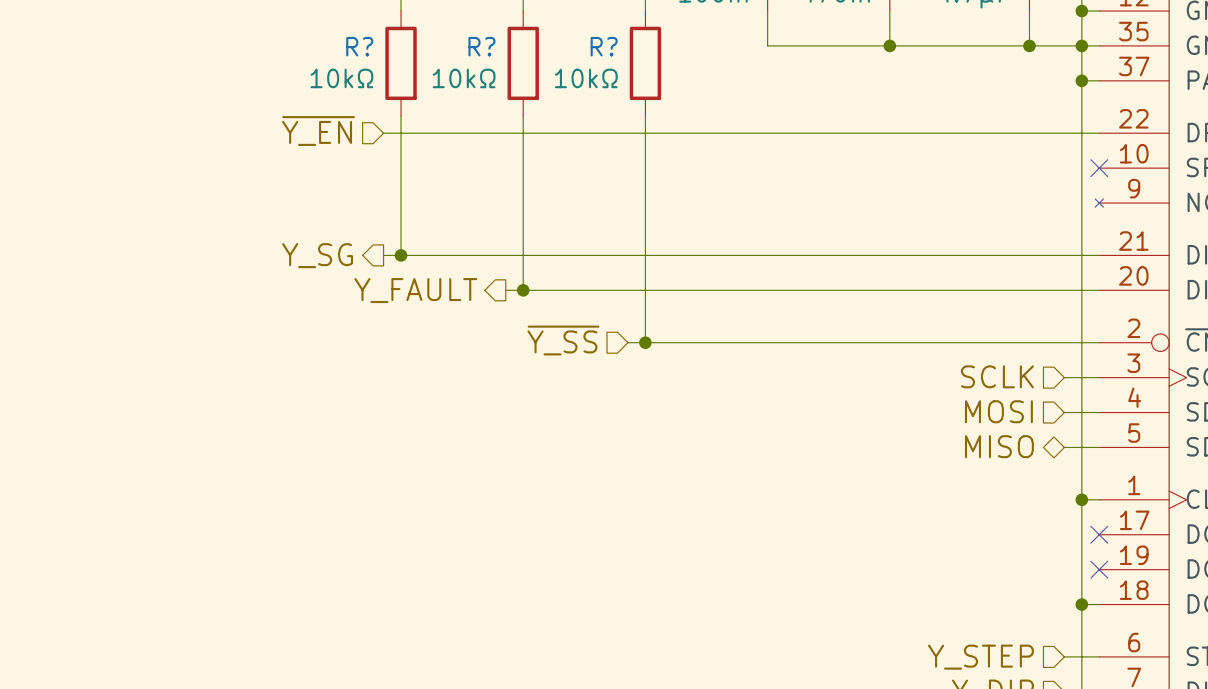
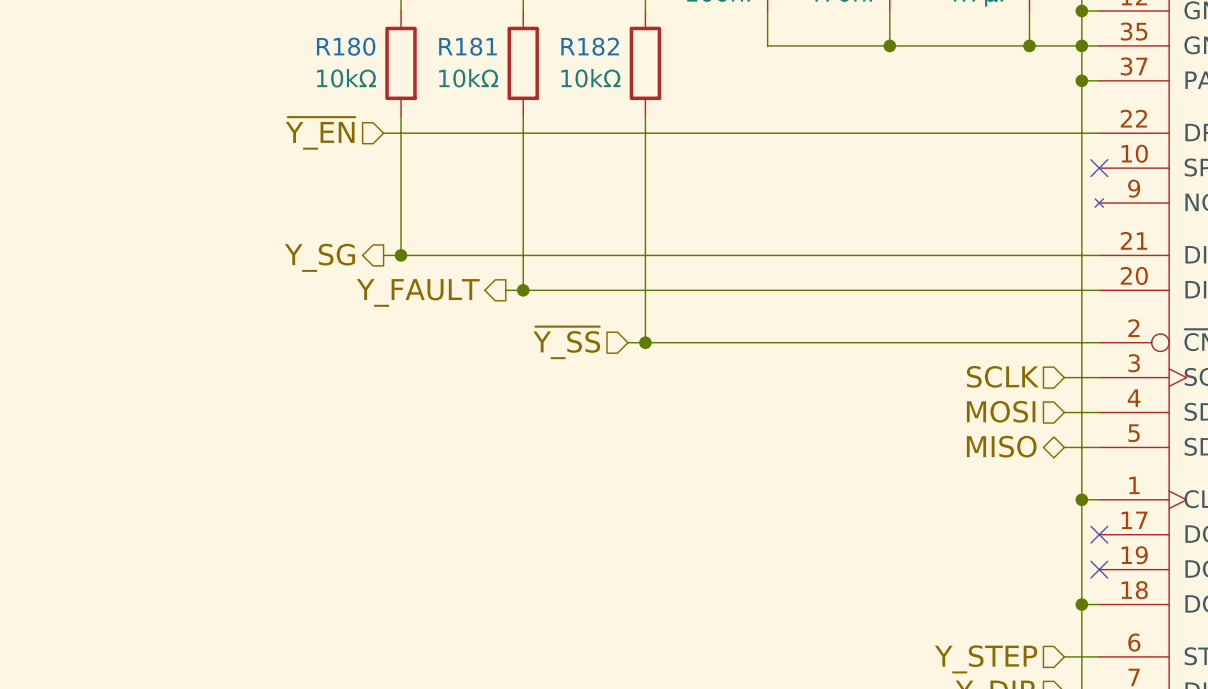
R? name: R? (359, 46) -> R180 (346, 46)
R? name: R? (481, 46) -> R181 (468, 46)
R? name: R? (604, 46) -> R182 (590, 46)

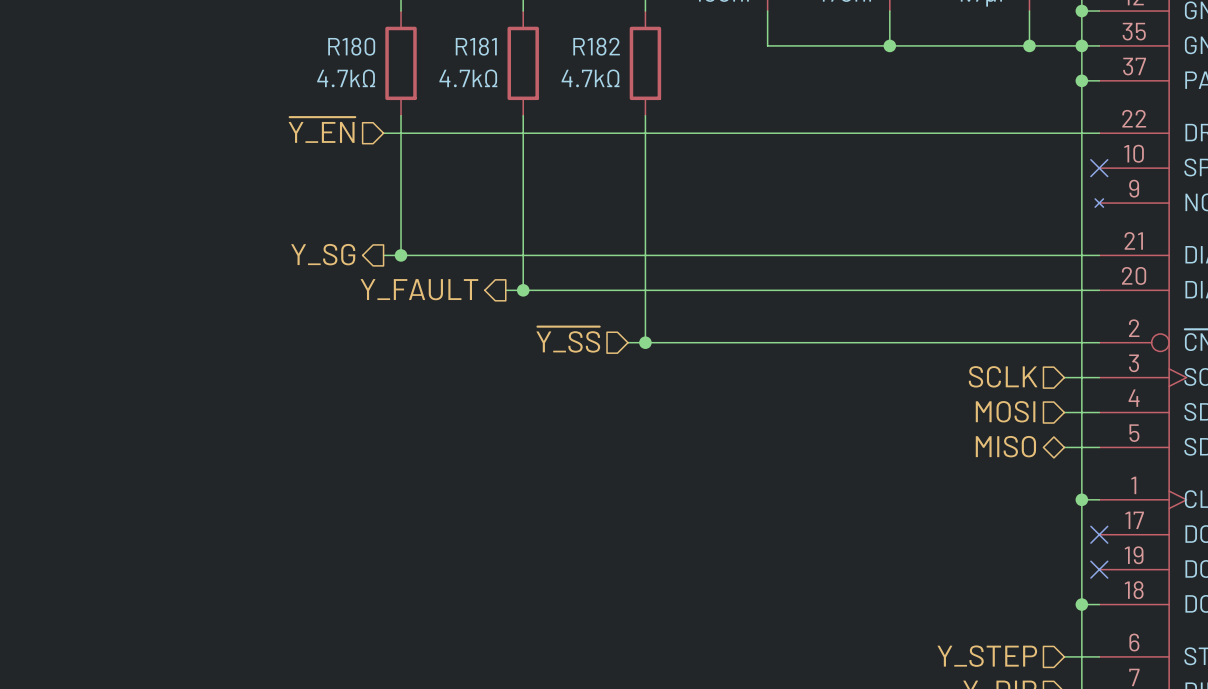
R180 value: 10kΩ (346, 78) -> 4.7kΩ (346, 78)
R181 value: 10kΩ (468, 78) -> 4.7kΩ (468, 78)
R182 value: 10kΩ (590, 78) -> 4.7kΩ (590, 78)

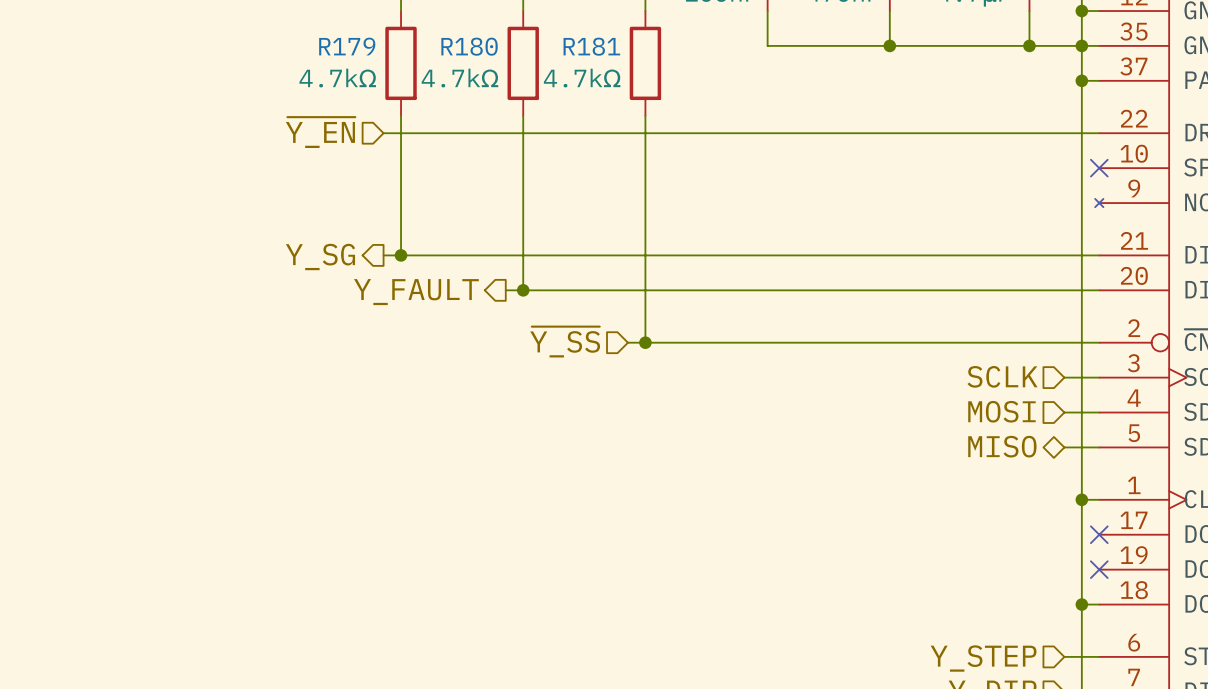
R180 name: R180 (351, 46) -> R179 (347, 46)
R181 name: R181 (476, 46) -> R180 (469, 46)
R182 name: R182 (596, 46) -> R181 (591, 46)

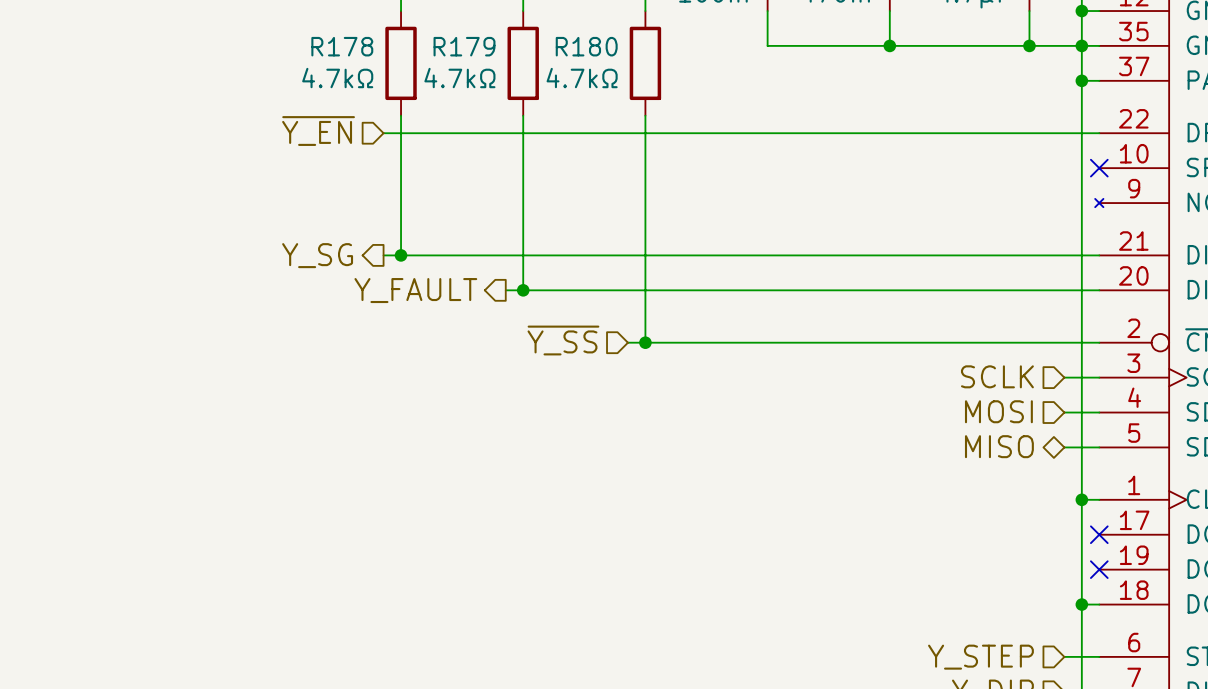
R179 name: R179 (347, 46) -> R178 (342, 46)
R180 name: R180 (469, 46) -> R179 (464, 46)
R181 name: R181 (591, 46) -> R180 (586, 46)

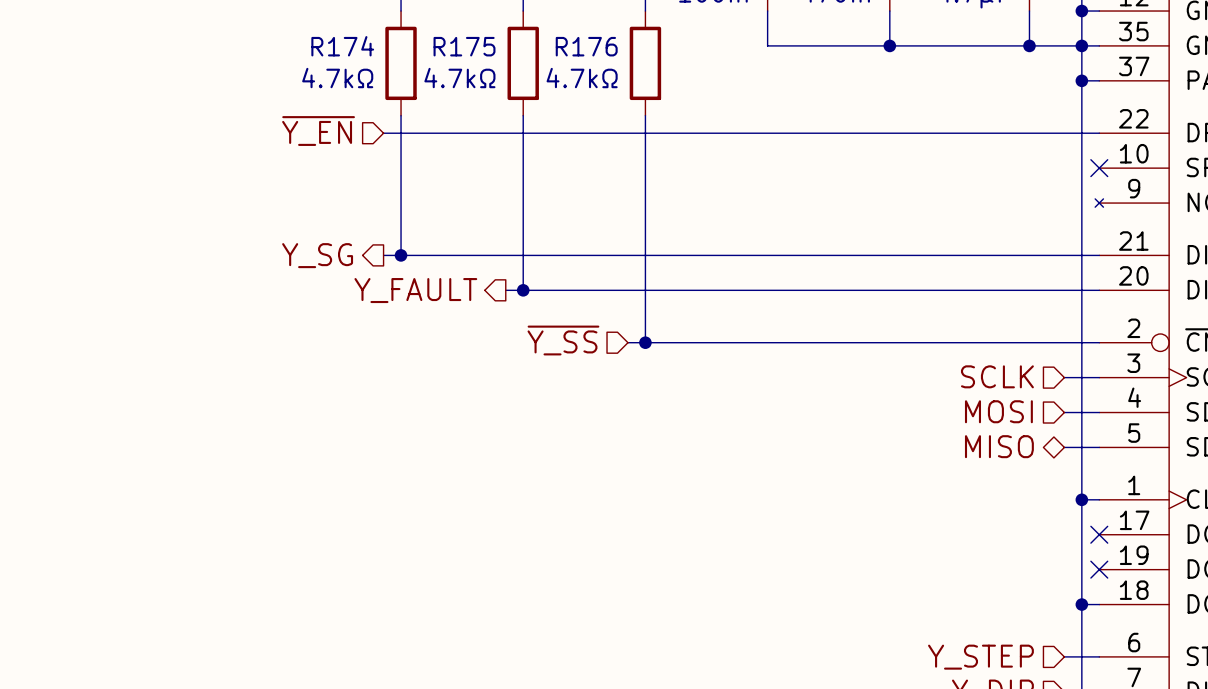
R178 name: R178 (342, 46) -> R174 (342, 46)
R179 name: R179 (464, 46) -> R175 (464, 46)
R180 name: R180 (586, 46) -> R176 (586, 46)

